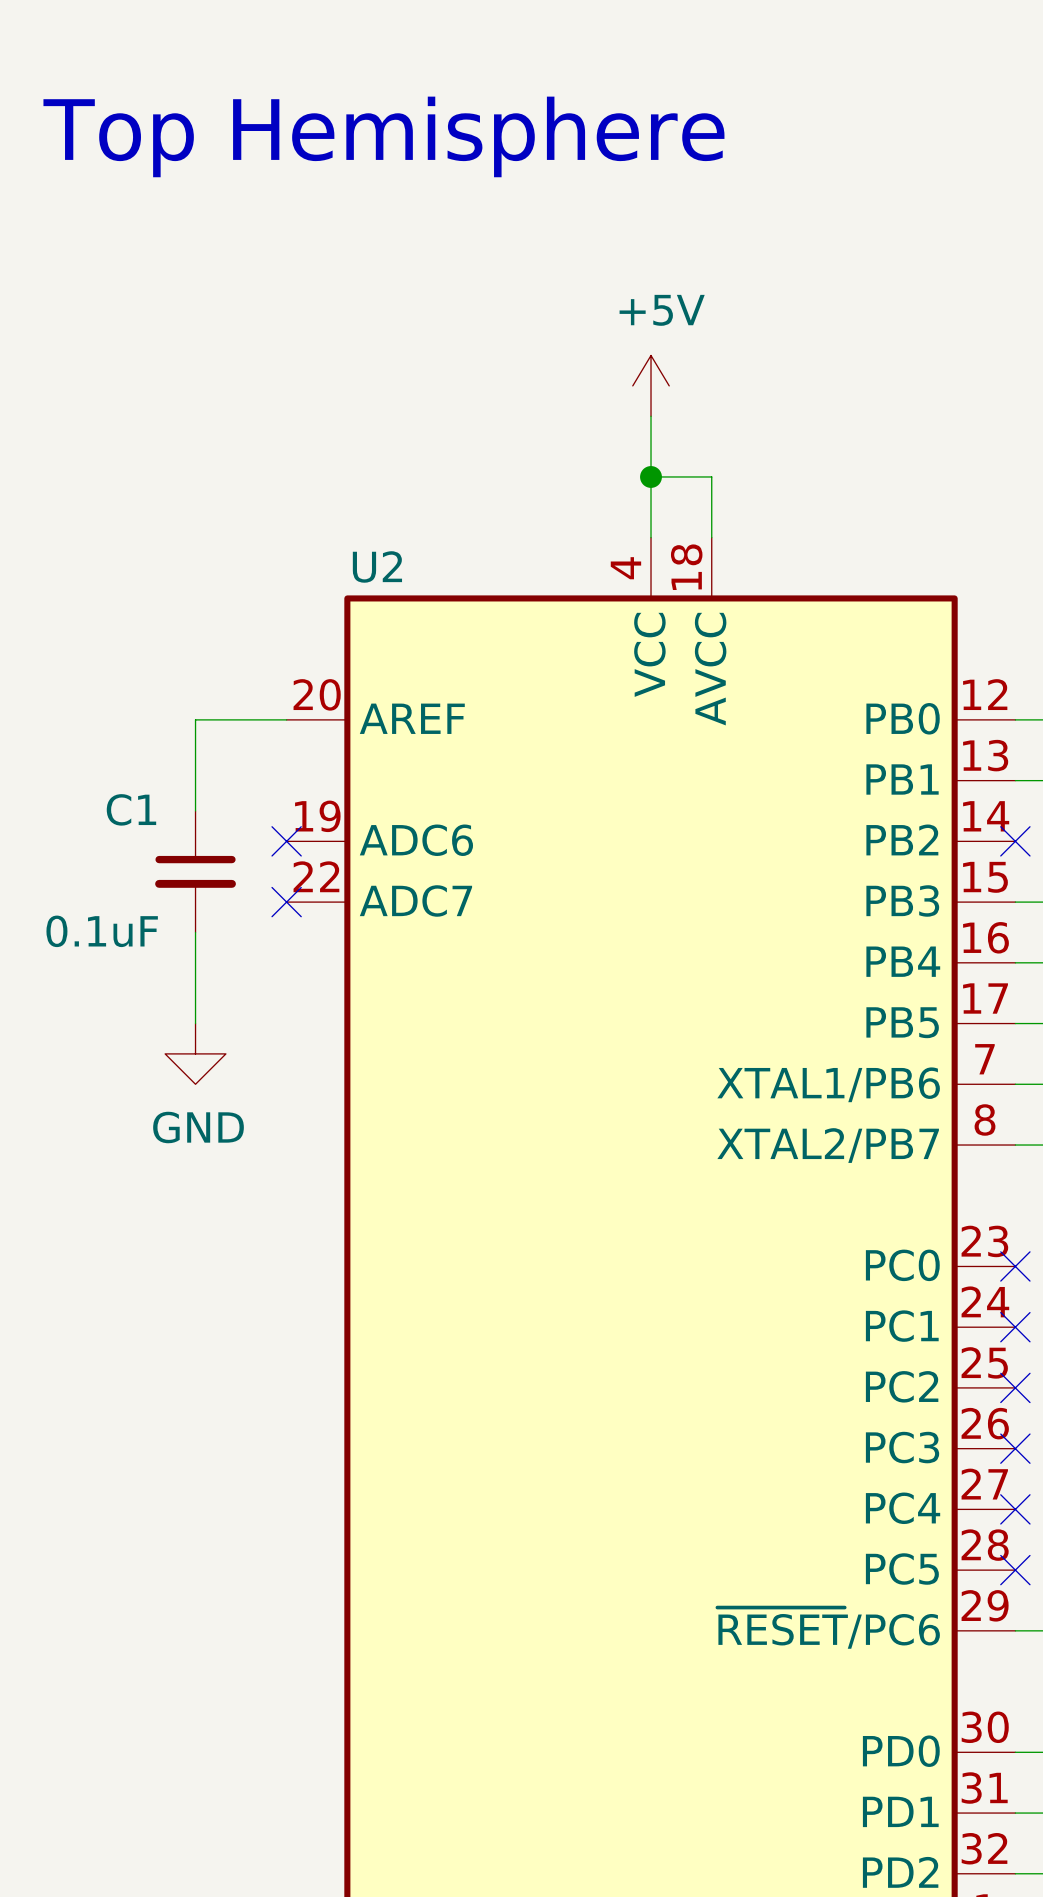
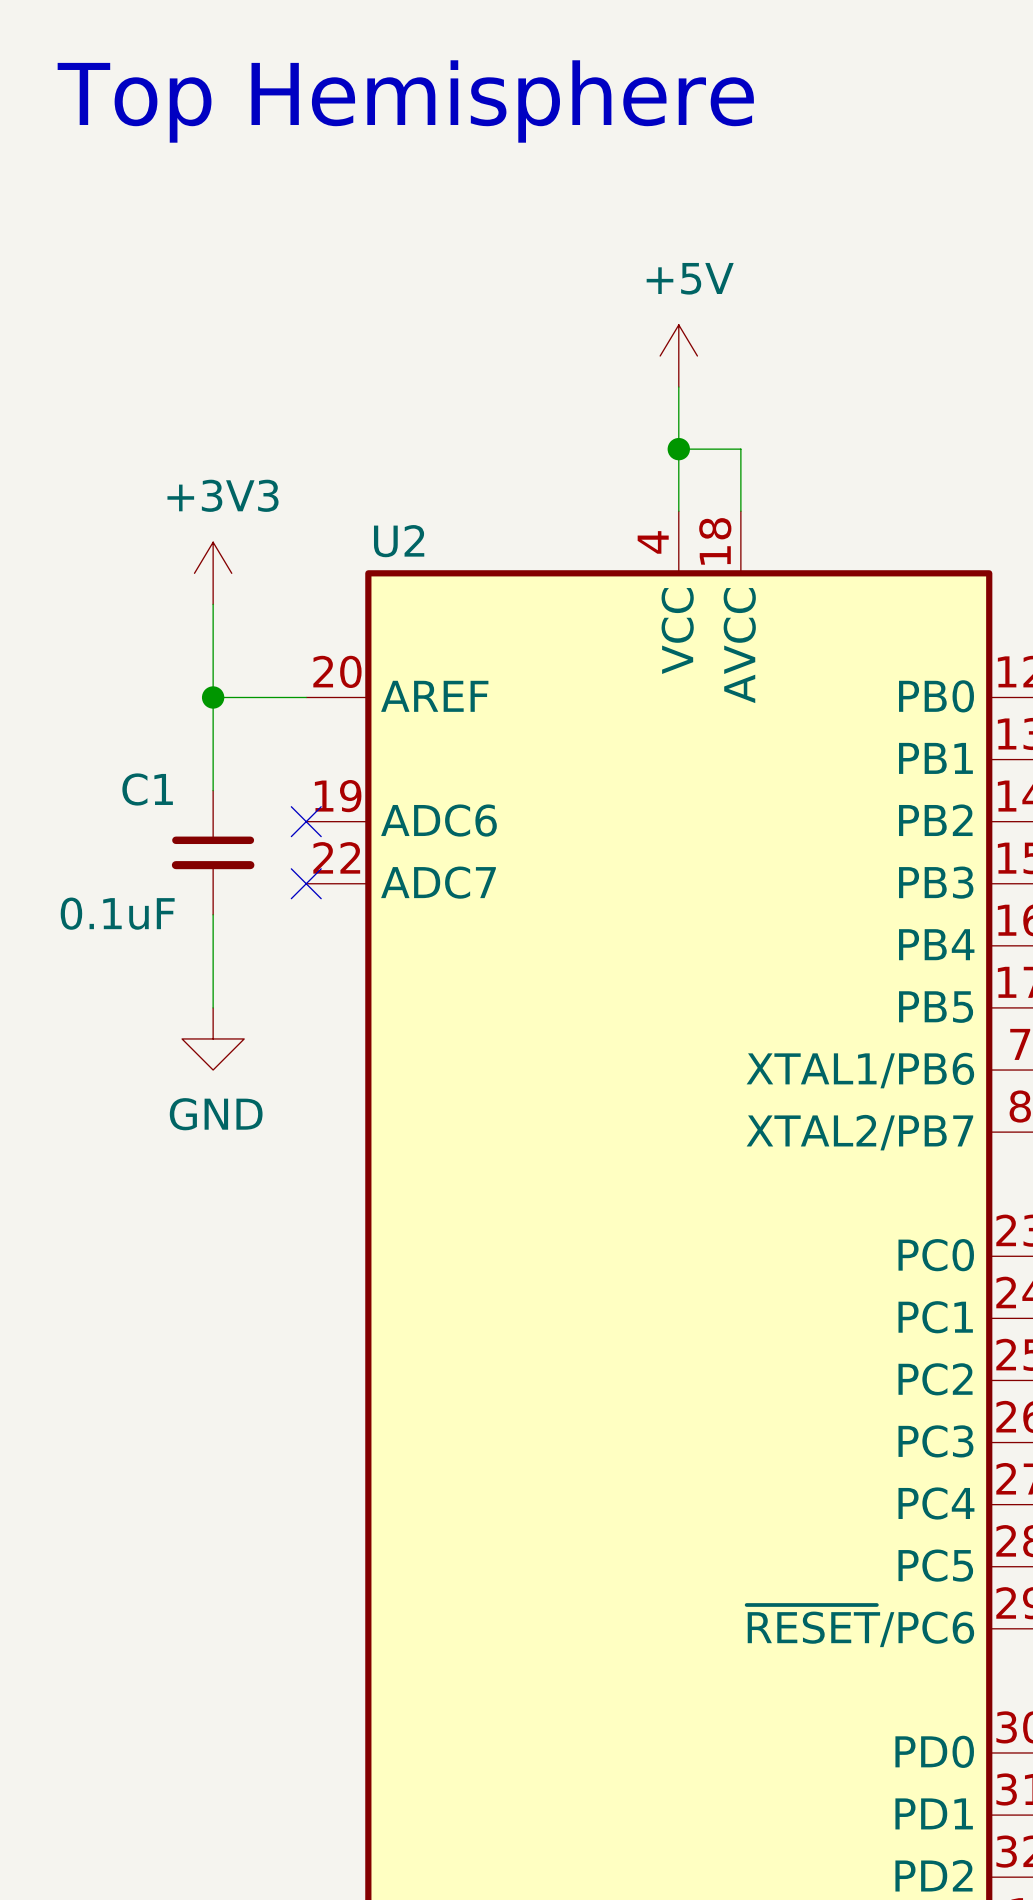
power symbol: none -> +3V3 (213, 573)
wire: none -> (213, 604) (213, 697)
junction: none -> (213, 697)

